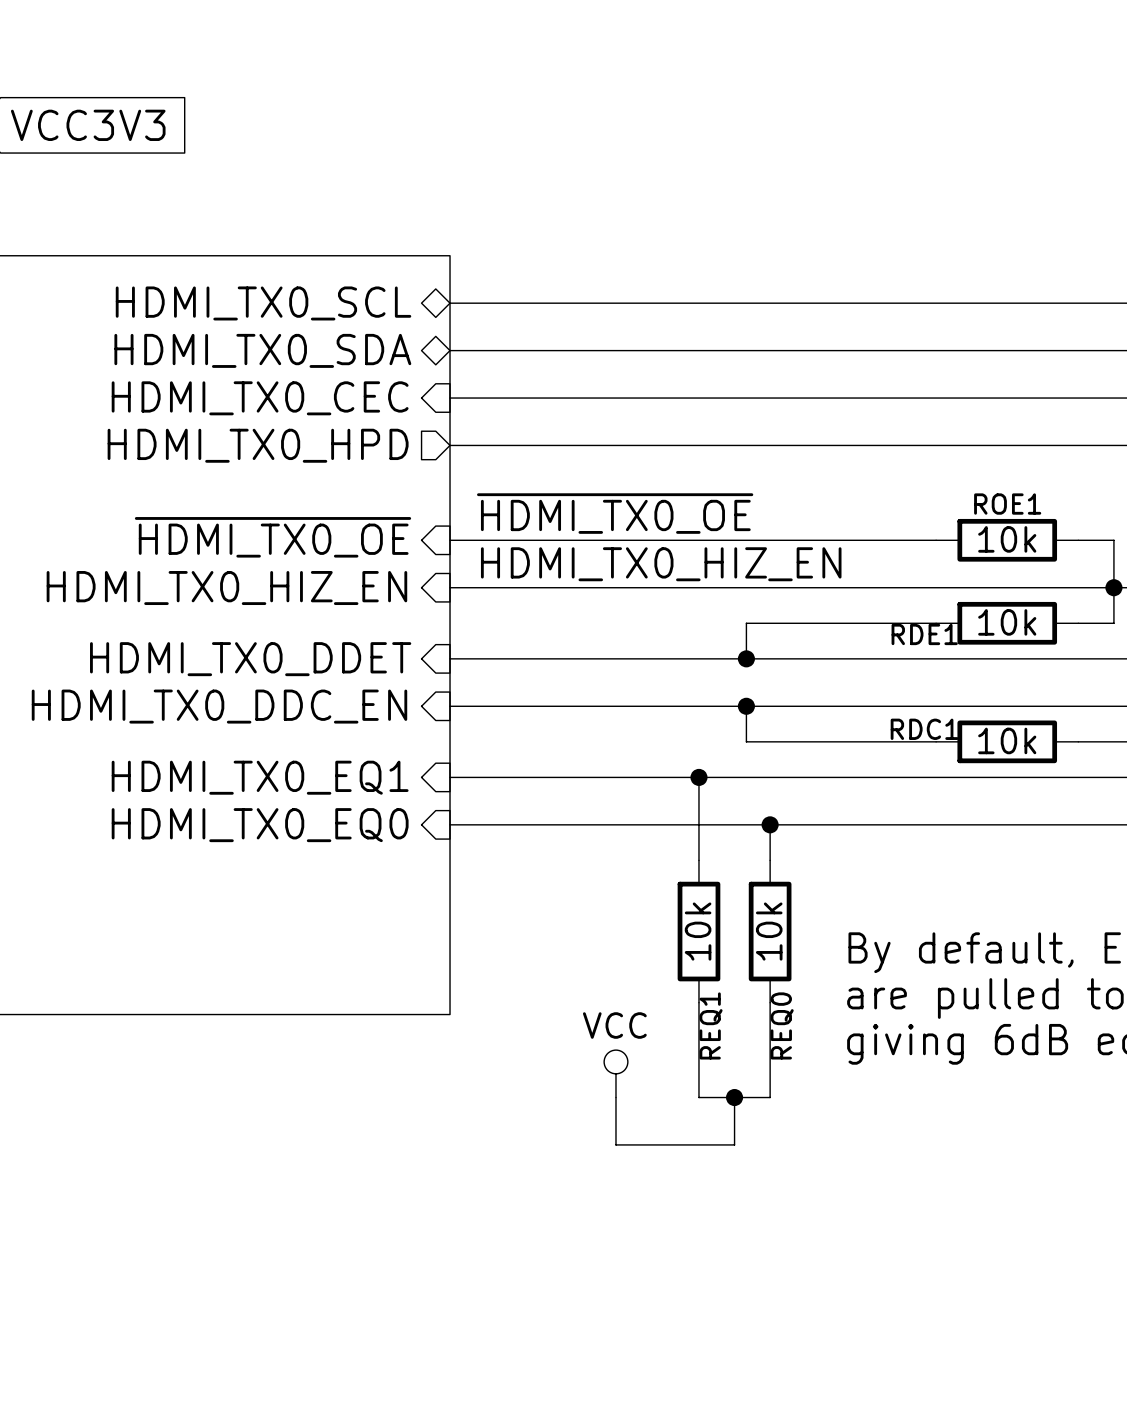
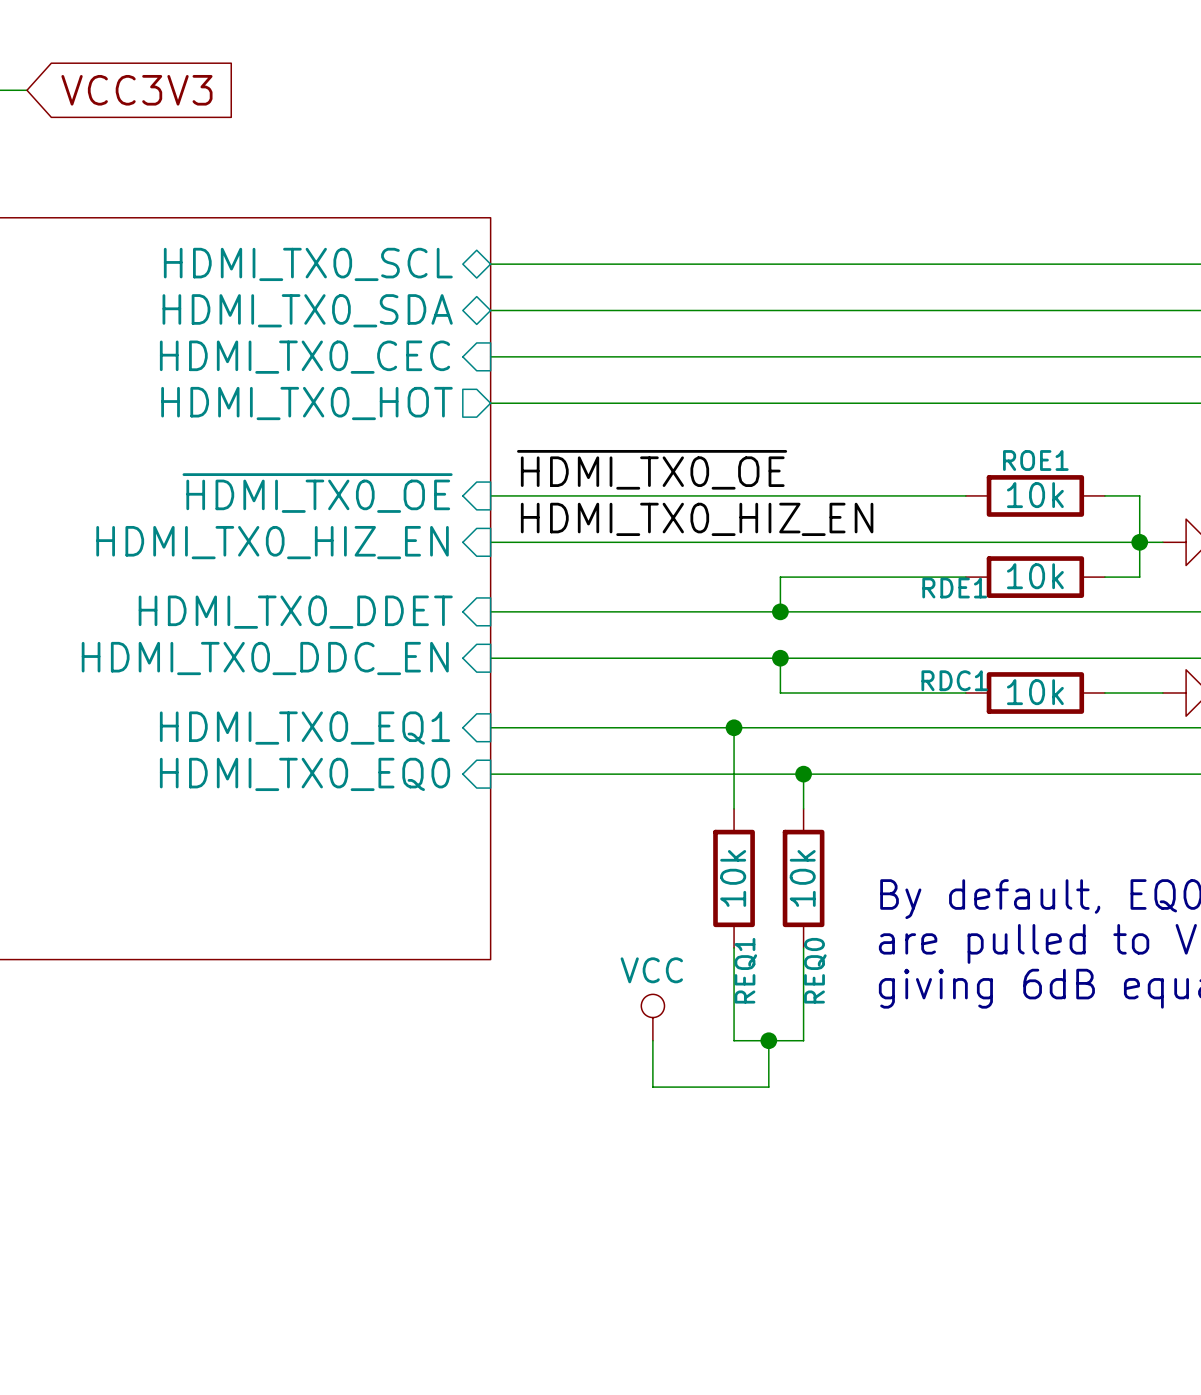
sheet pin: HDMI_TX0_HPD (258, 445) -> HDMI_TX0_HOT (306, 403)

